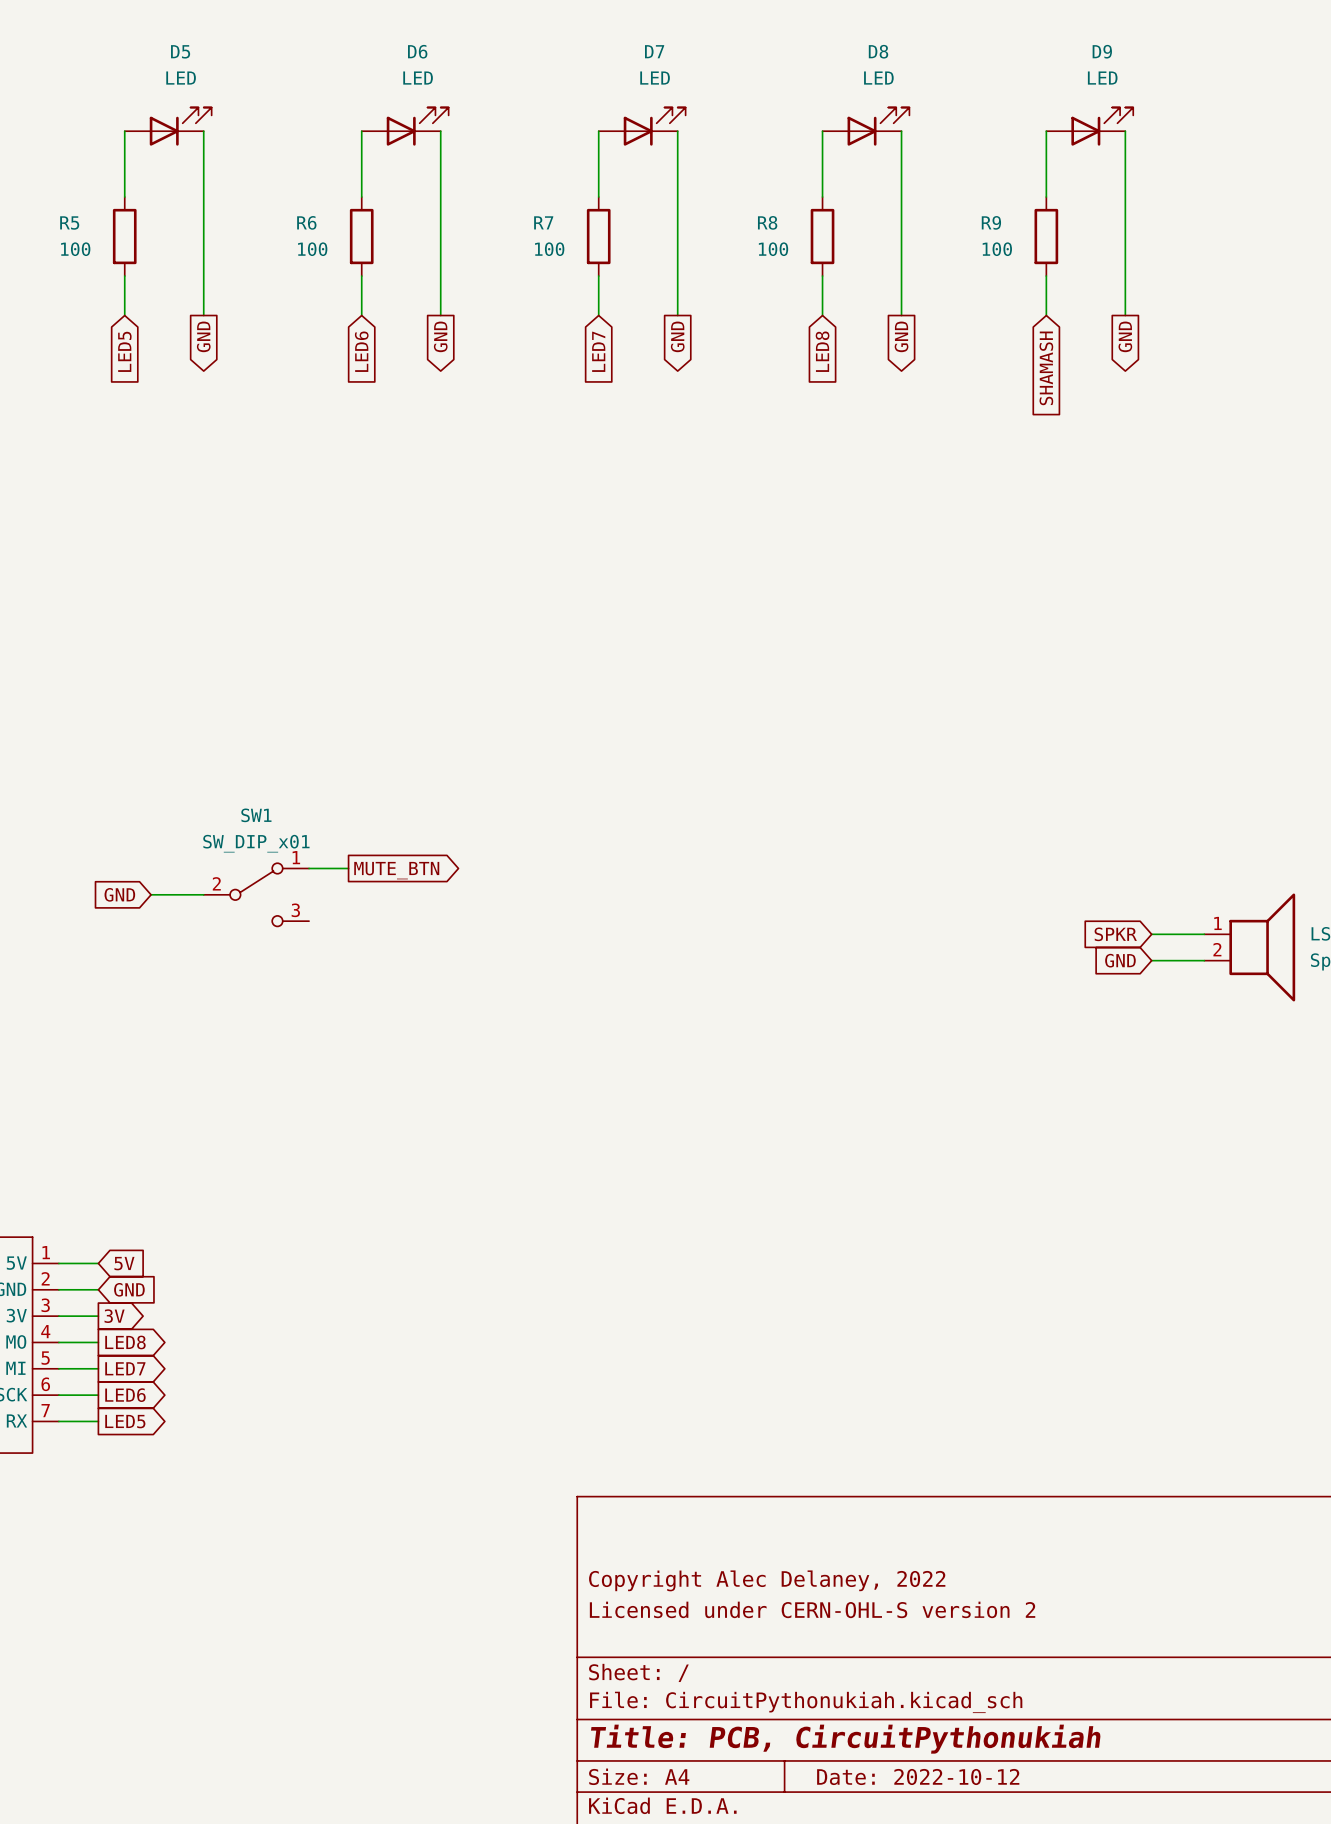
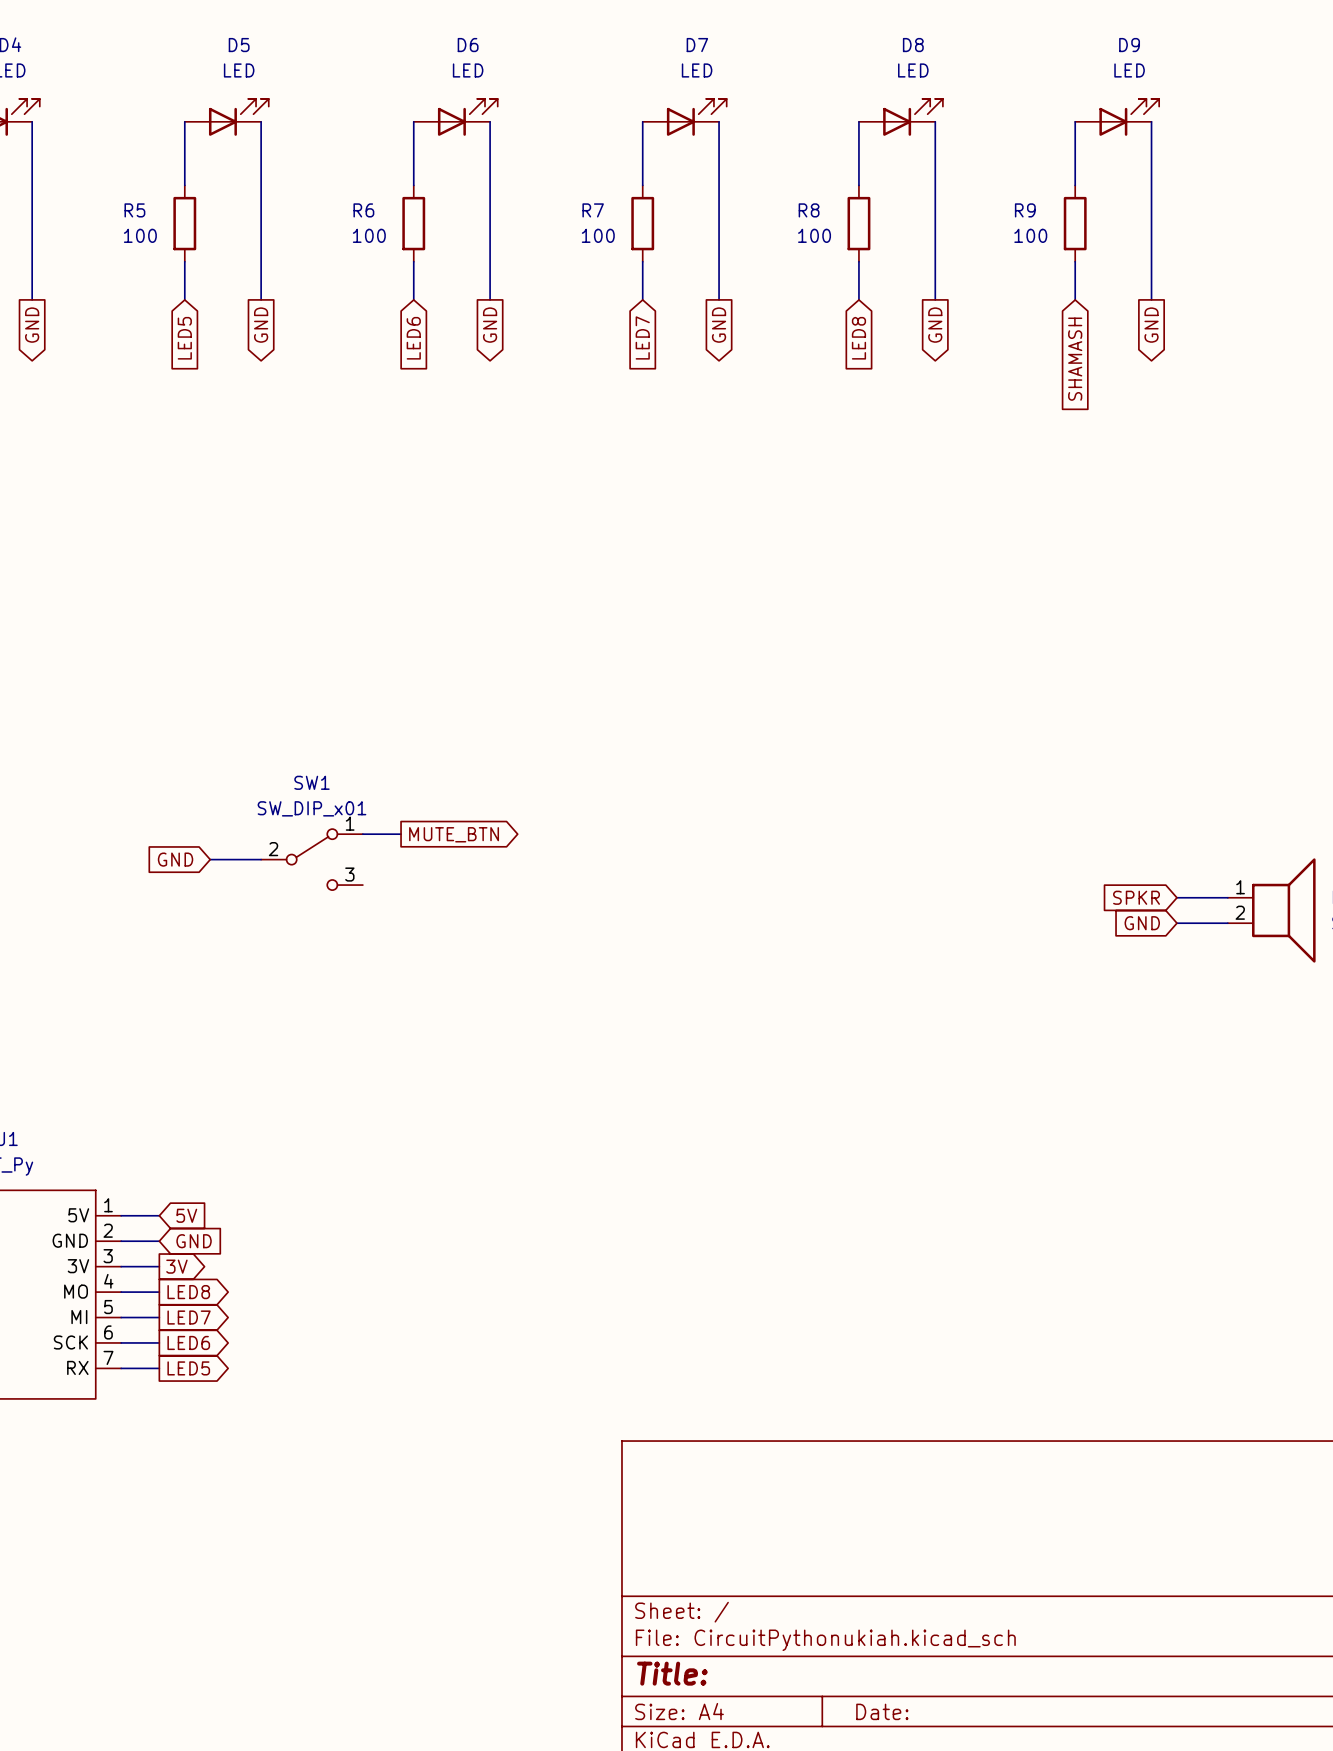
title block: Copyright Alec Delaney, 2022 (767, 1580) -> none
title block: Licensed under CERN-OHL-S version 2 (812, 1609) -> none
title block: Title: PCB, CircuitPythonukiah (845, 1739) -> Title: (672, 1673)
title block: Date: 2022-10-12 (918, 1776) -> Date: (882, 1711)

